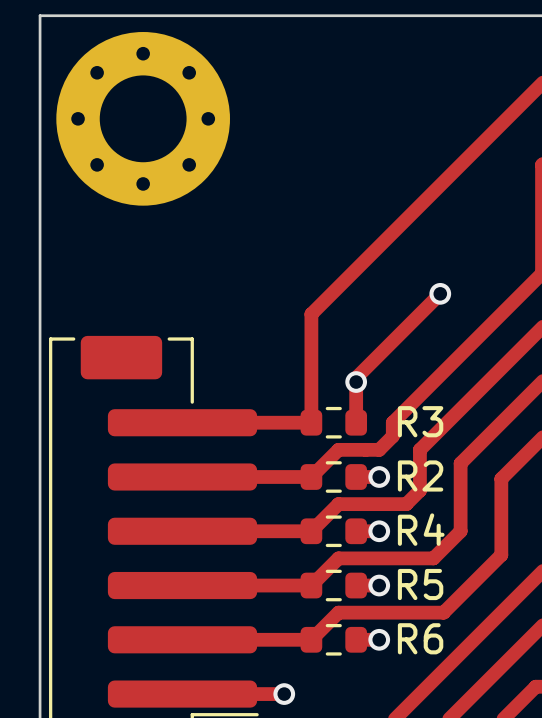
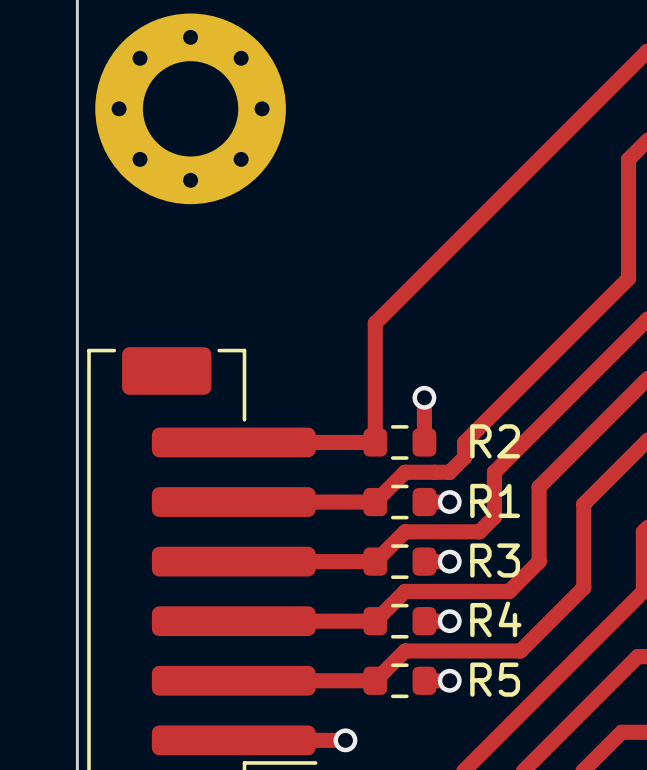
track: (440, 293) (356, 377) (356, 382) -> none
via: (440, 293) -> none
R3 name: R3 (420, 421) -> R2 (495, 441)
R2 name: R2 (420, 475) -> R1 (495, 500)
R4 name: R4 (421, 529) -> R3 (495, 560)
R5 name: R5 (420, 584) -> R4 (495, 619)
R6 name: R6 (420, 638) -> R5 (495, 679)

